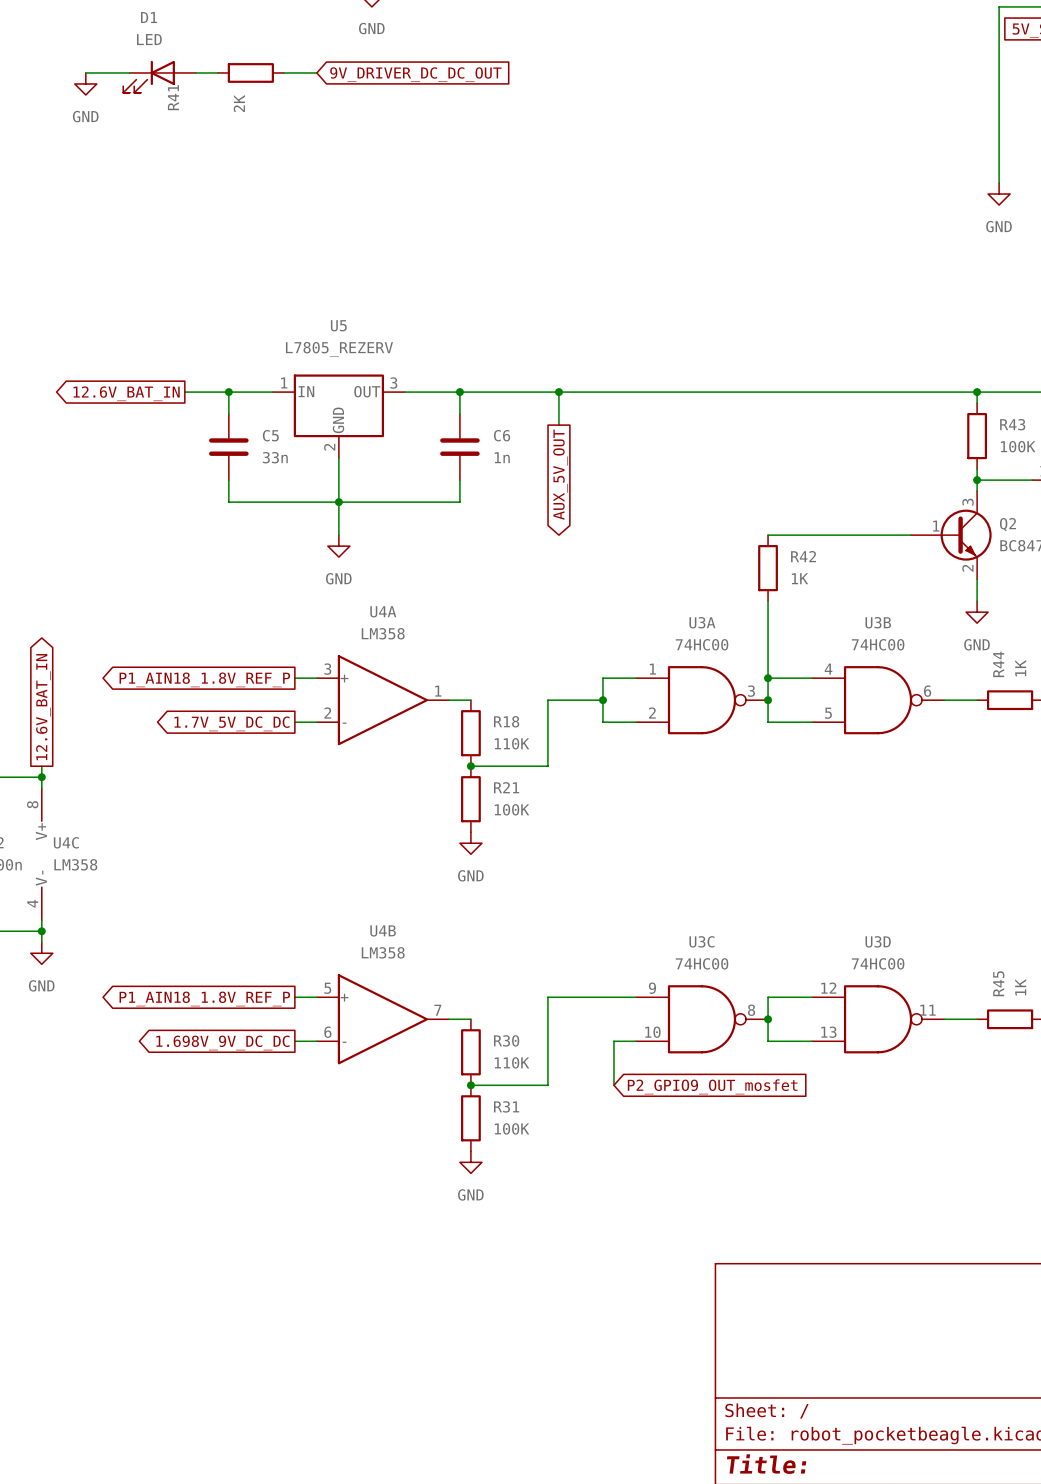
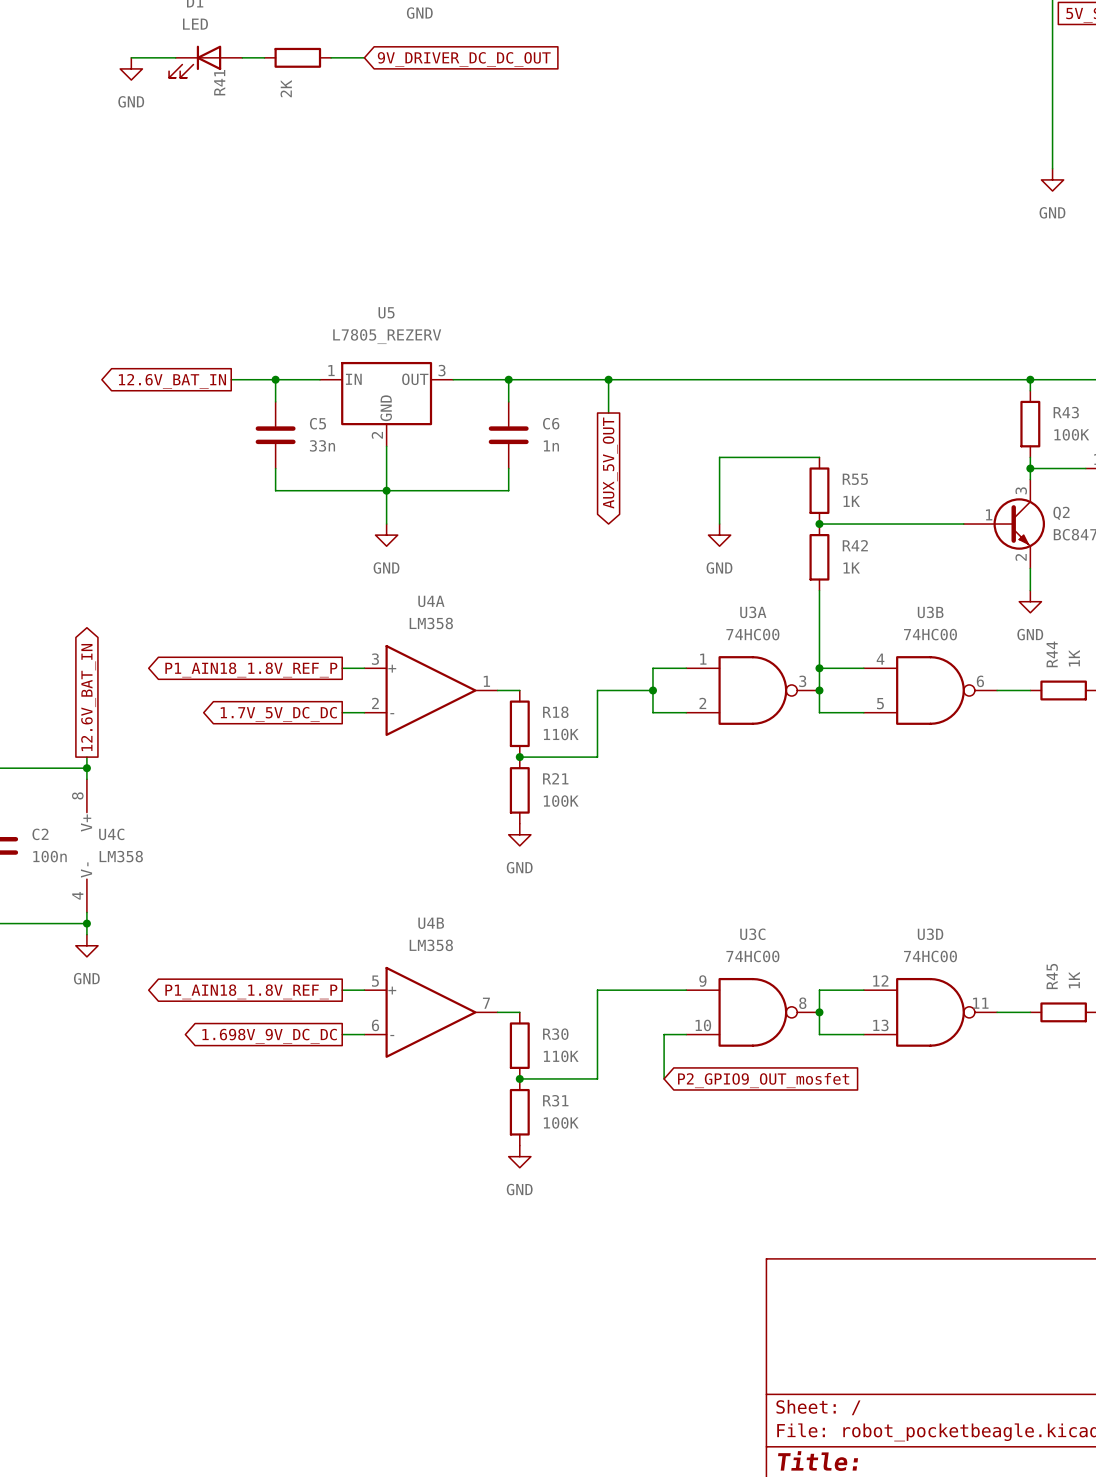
wire: none -> (819, 457) (719, 457) (719, 524)
R55: none -> 1K (819, 490)
junction: none -> (819, 524)
power symbol: none -> GND (719, 535)

